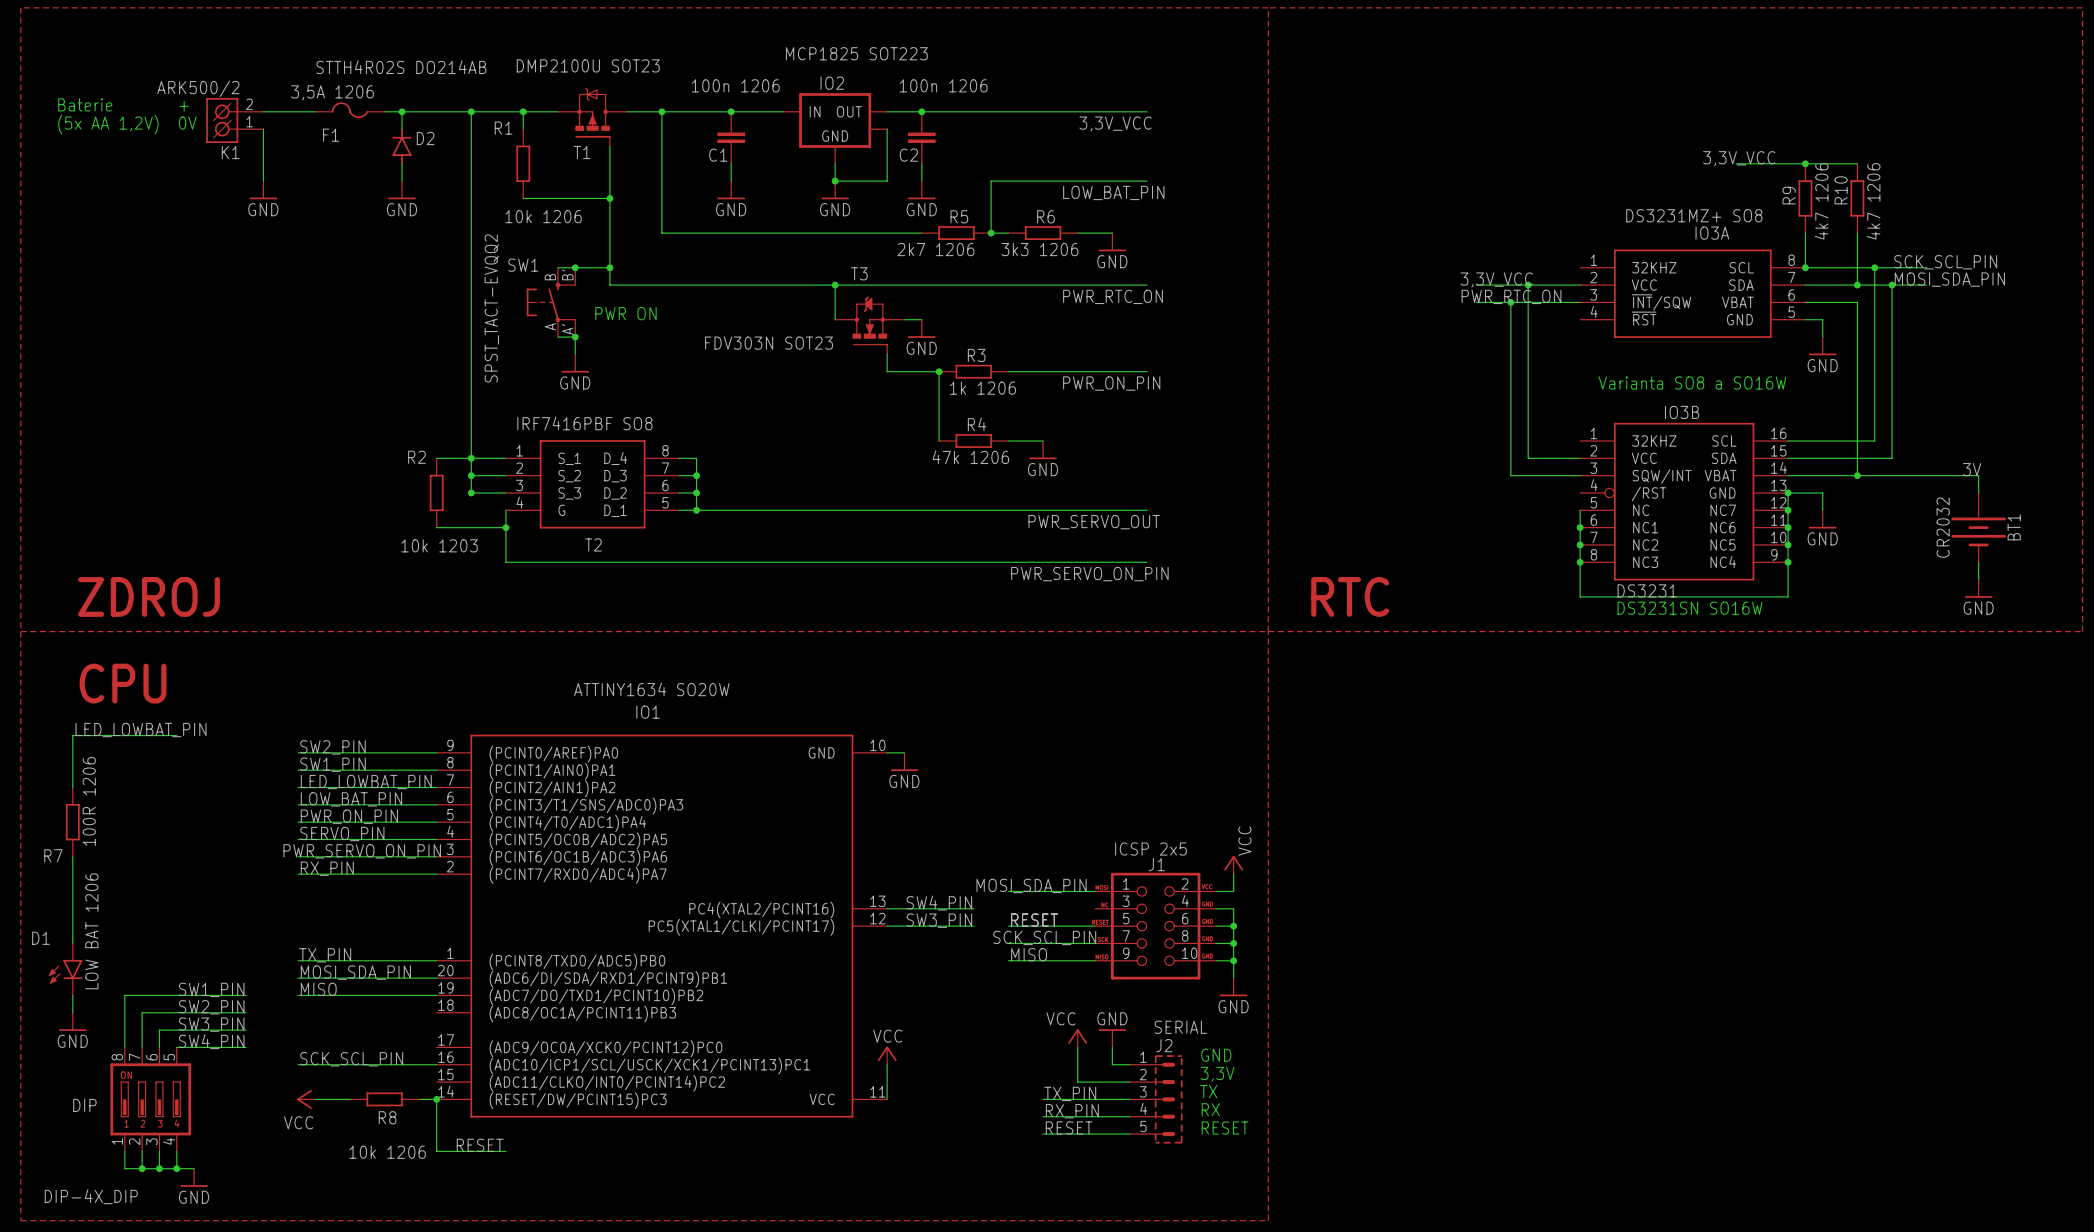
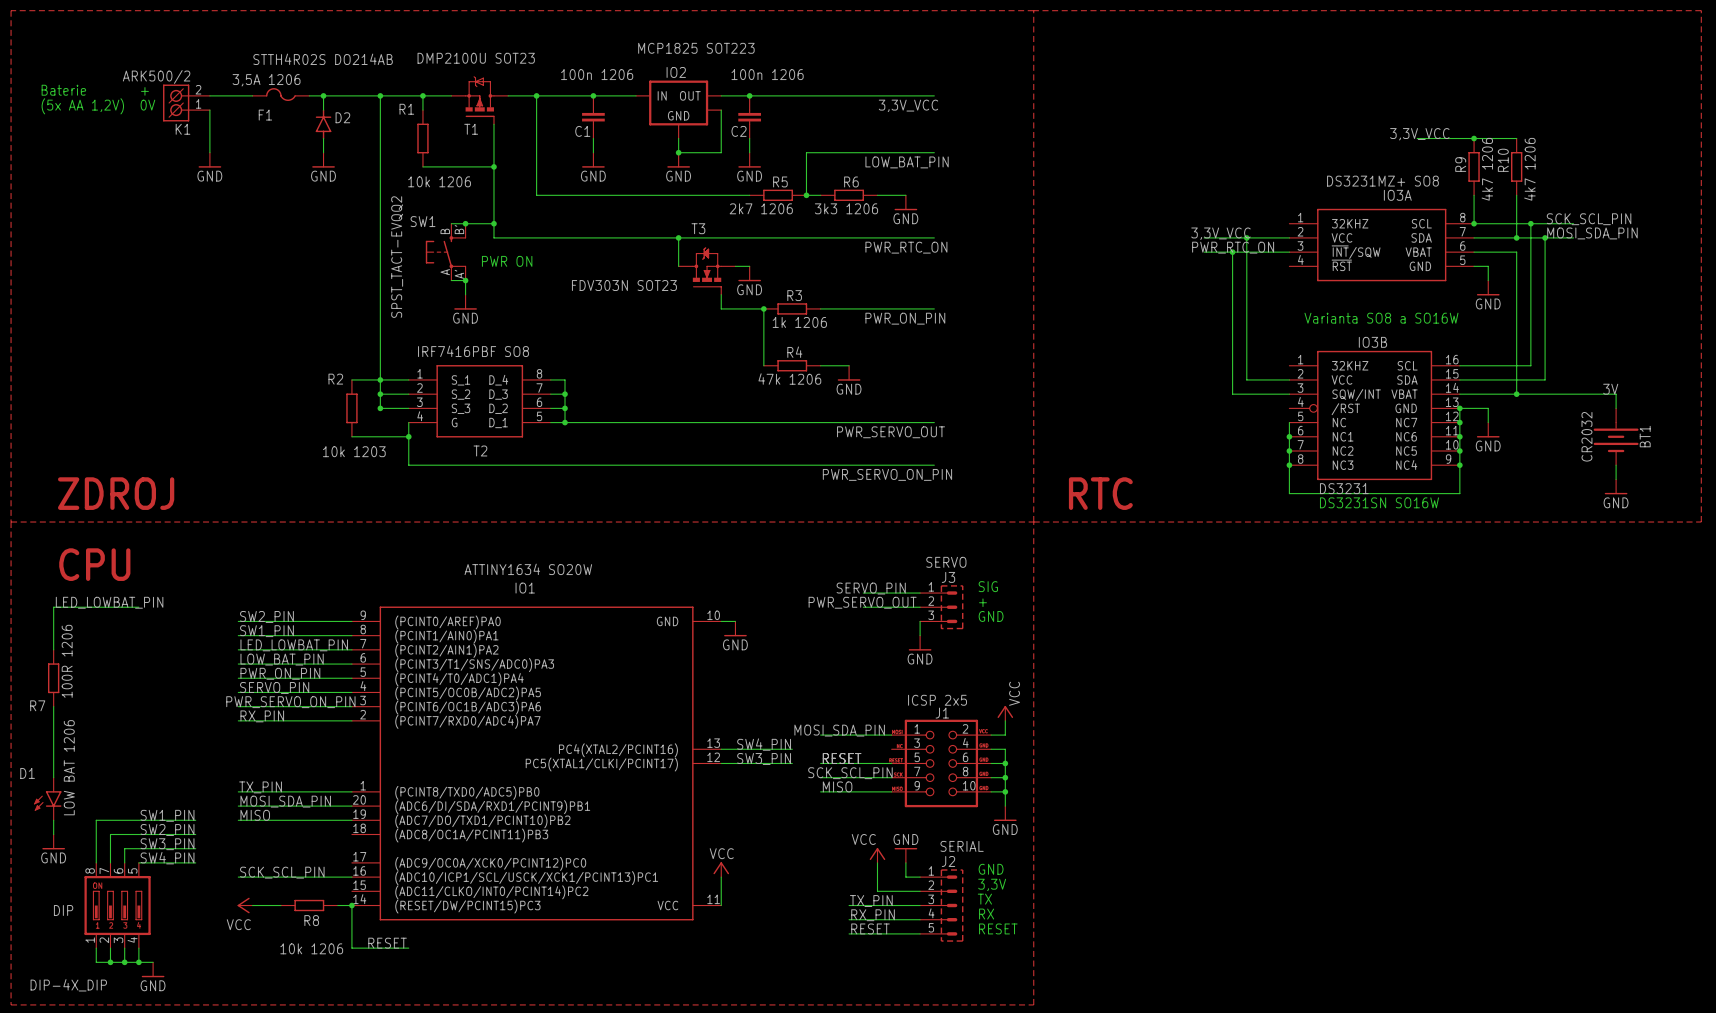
text: none -> SIG (988, 586)
label: none -> SERVO_PIN (871, 588)
wire: none -> (863, 593) (920, 593)
label: none -> PWR_SERVO_OUT (862, 602)
text: none -> + (982, 602)
wire: none -> (863, 607) (920, 607)
J3: none -> SERVO (941, 607)
text: none -> GND (991, 616)
wire: none -> (920, 621) (920, 635)
power symbol: none -> GND (920, 643)

